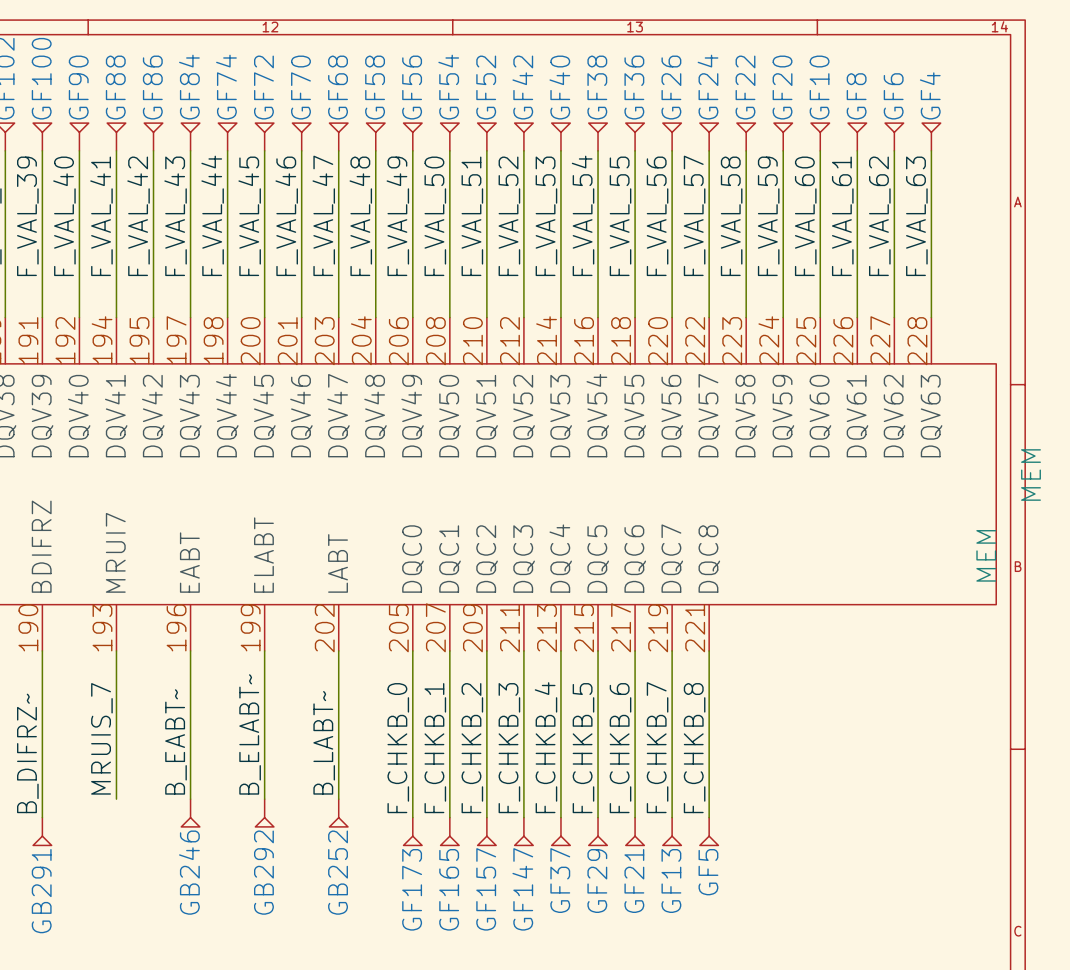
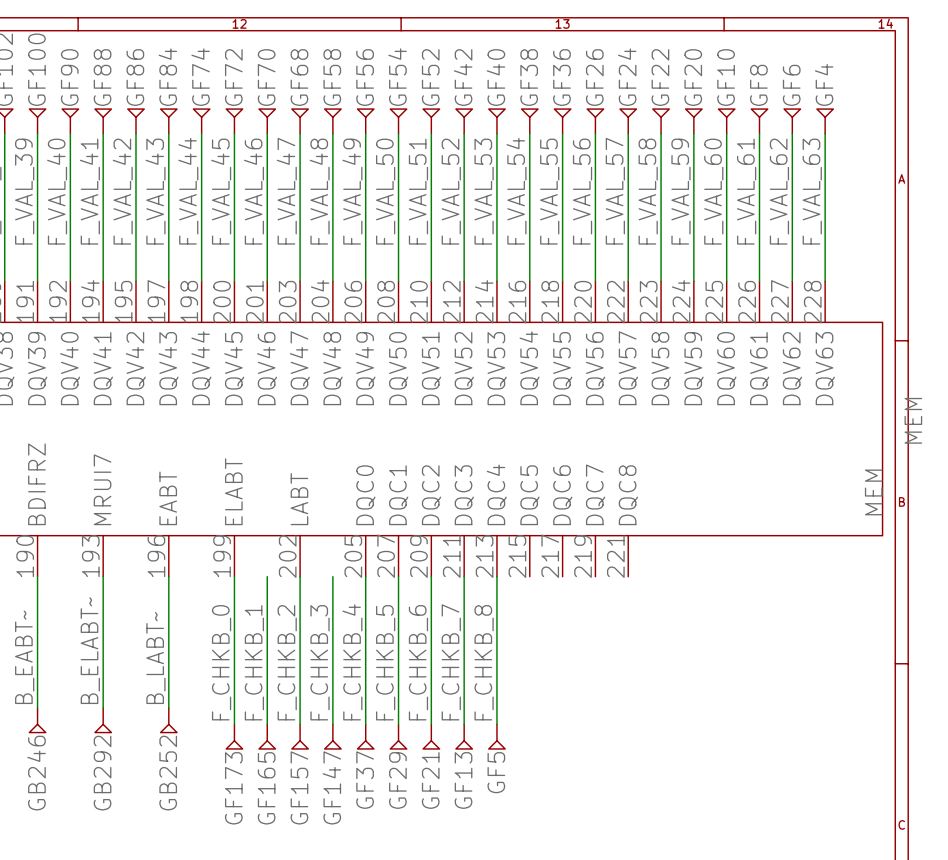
wire: none -> (267, 576) (267, 724)
wire: none -> (332, 576) (332, 724)
wire: (598, 650) (598, 817) -> none
wire: (635, 650) (635, 817) -> none
wire: (672, 650) (672, 817) -> none
wire: (709, 650) (709, 817) -> none
label: B_ELABT~ (250, 734) -> none
label: MRUIS_7 (101, 738) -> B_ELABT~ (90, 650)
label: none -> B_EABT~ (24, 657)
label: B_EABT~ (176, 741) -> B_LABT~ (155, 658)
label: B_LABT~ (324, 742) -> none
label: F_CHKB_4 (546, 747) -> F_CHKB_8 (484, 662)
label: F_CHKB_7 (657, 747) -> none
label: none -> F_CHKB_0 (221, 662)
label: none -> F_CHKB_1 (254, 662)
label: none -> F_CHKB_2 (287, 662)
label: none -> F_CHKB_3 (320, 662)
label: F_CHKB_0 (398, 748) -> F_CHKB_4 (352, 662)
label: F_CHKB_1 (435, 748) -> F_CHKB_5 (385, 662)
label: F_CHKB_2 (472, 748) -> F_CHKB_6 (418, 662)
label: F_CHKB_3 (509, 748) -> F_CHKB_7 (451, 662)
label: F_CHKB_5 (583, 748) -> none
label: F_CHKB_6 (620, 748) -> none
label: F_CHKB_8 (694, 748) -> none
label: B_DIFRZ~ (27, 753) -> none
GB246: none -> (37, 720)
GB292 position: (264, 813) -> (103, 720)
GB252: (338, 813) -> none
GB291: (42, 831) -> none
GF173: none -> (234, 736)
GF165: none -> (267, 736)
GF157: none -> (300, 736)
GF147: none -> (332, 736)
GF29: (598, 831) -> none
GF21: (635, 831) -> none
GF13: (672, 831) -> none
GF5: (709, 831) -> none
GB246 name: GB246 (189, 872) -> GB252 (168, 773)
GF37 name: GF37 (560, 880) -> GF5 (496, 772)
GF173 name: GF173 (412, 889) -> GF37 (365, 780)
GF165 name: GF165 (449, 889) -> GF29 (397, 780)
GF157 name: GF157 (486, 889) -> GF21 (430, 780)
GF147 name: GF147 (522, 889) -> GF13 (463, 780)

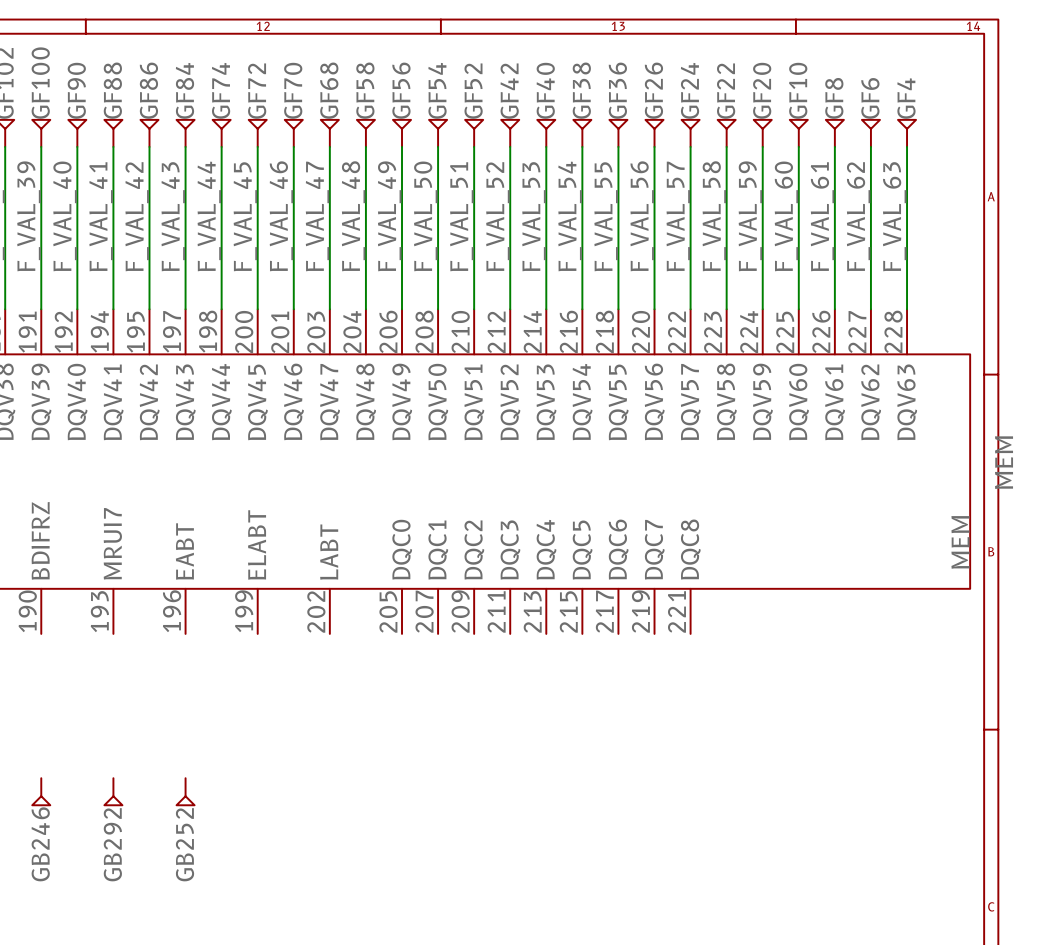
wire: (37, 576) (37, 707) -> none
wire: (103, 576) (103, 707) -> none
wire: (168, 576) (168, 707) -> none
wire: (234, 576) (234, 724) -> none
wire: (267, 576) (267, 724) -> none
wire: (300, 576) (300, 724) -> none
wire: (332, 576) (332, 724) -> none
wire: (365, 576) (365, 724) -> none
wire: (398, 576) (398, 724) -> none
wire: (431, 576) (431, 724) -> none
wire: (464, 576) (464, 724) -> none
wire: (496, 576) (496, 724) -> none
label: B_ELABT~ (90, 650) -> none
label: B_EABT~ (24, 657) -> none
label: B_LABT~ (155, 658) -> none
label: F_CHKB_0 (221, 662) -> none
label: F_CHKB_1 (254, 662) -> none
label: F_CHKB_2 (287, 662) -> none
label: F_CHKB_3 (320, 662) -> none
label: F_CHKB_4 (352, 662) -> none
label: F_CHKB_5 (385, 662) -> none
label: F_CHKB_6 (418, 662) -> none
label: F_CHKB_7 (451, 662) -> none
label: F_CHKB_8 (484, 662) -> none
GF173: (234, 736) -> none
GF165: (267, 736) -> none
GF157: (300, 736) -> none
GF147: (332, 736) -> none
GF37: (365, 736) -> none
GF29: (398, 736) -> none
GF21: (431, 736) -> none
GF13: (464, 736) -> none
GF5: (496, 736) -> none

